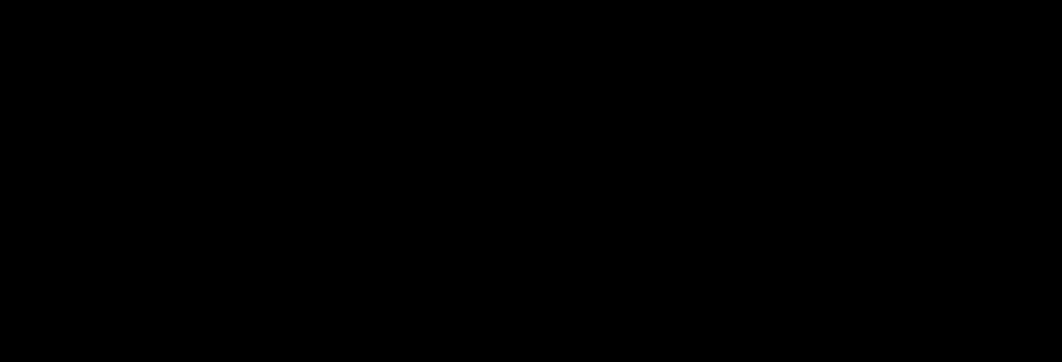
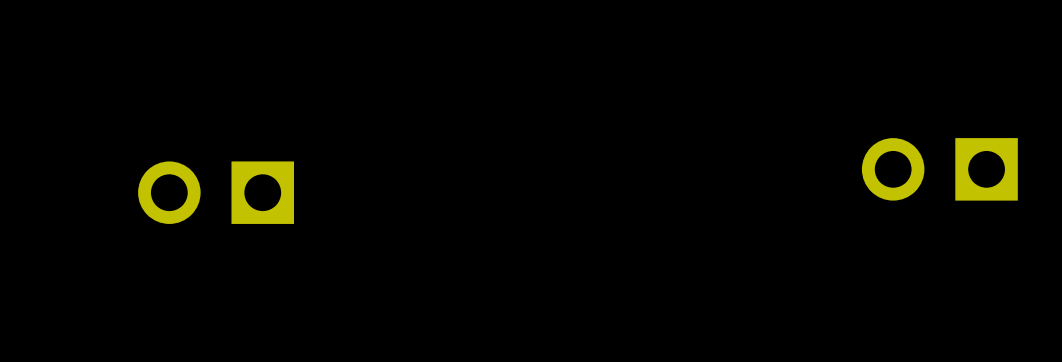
part: none -> (939, 169)
part: none -> (216, 192)

